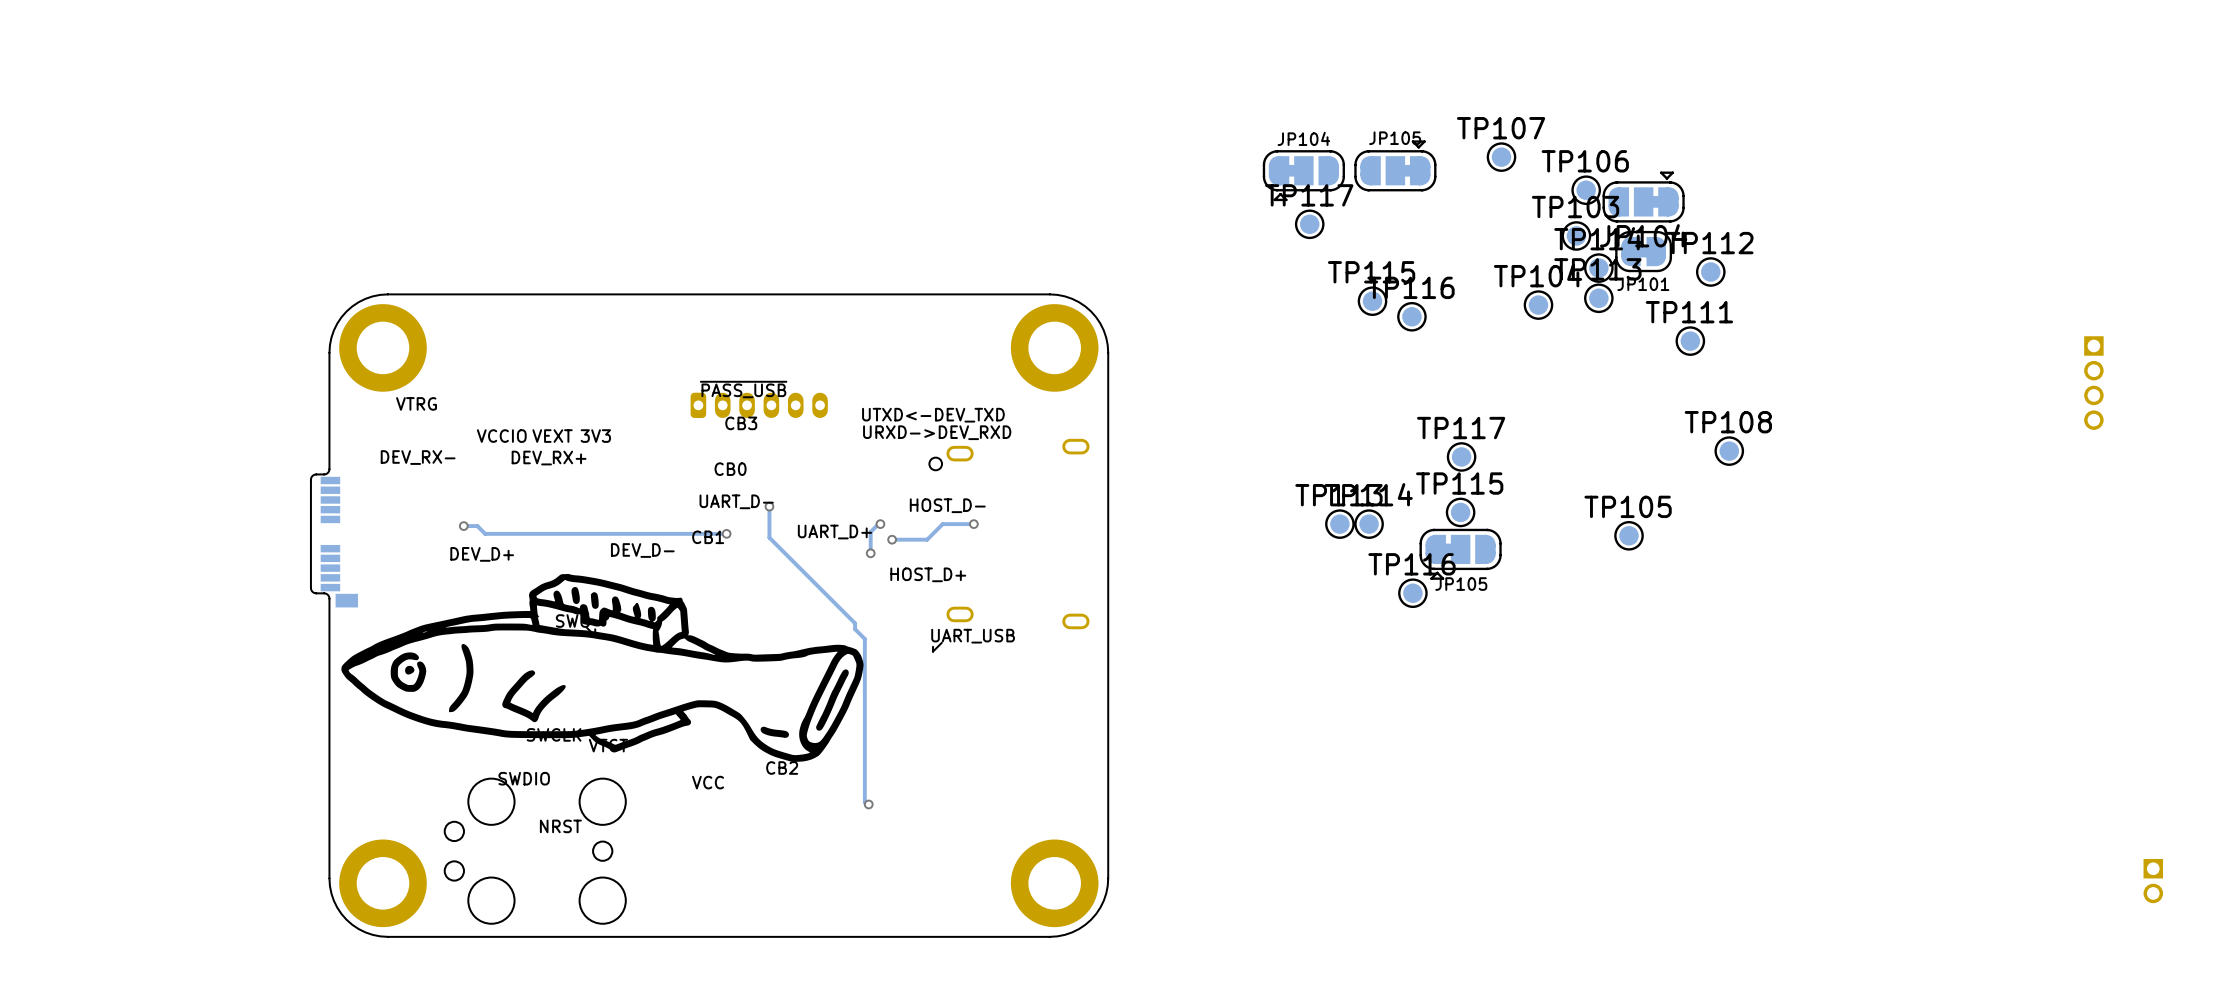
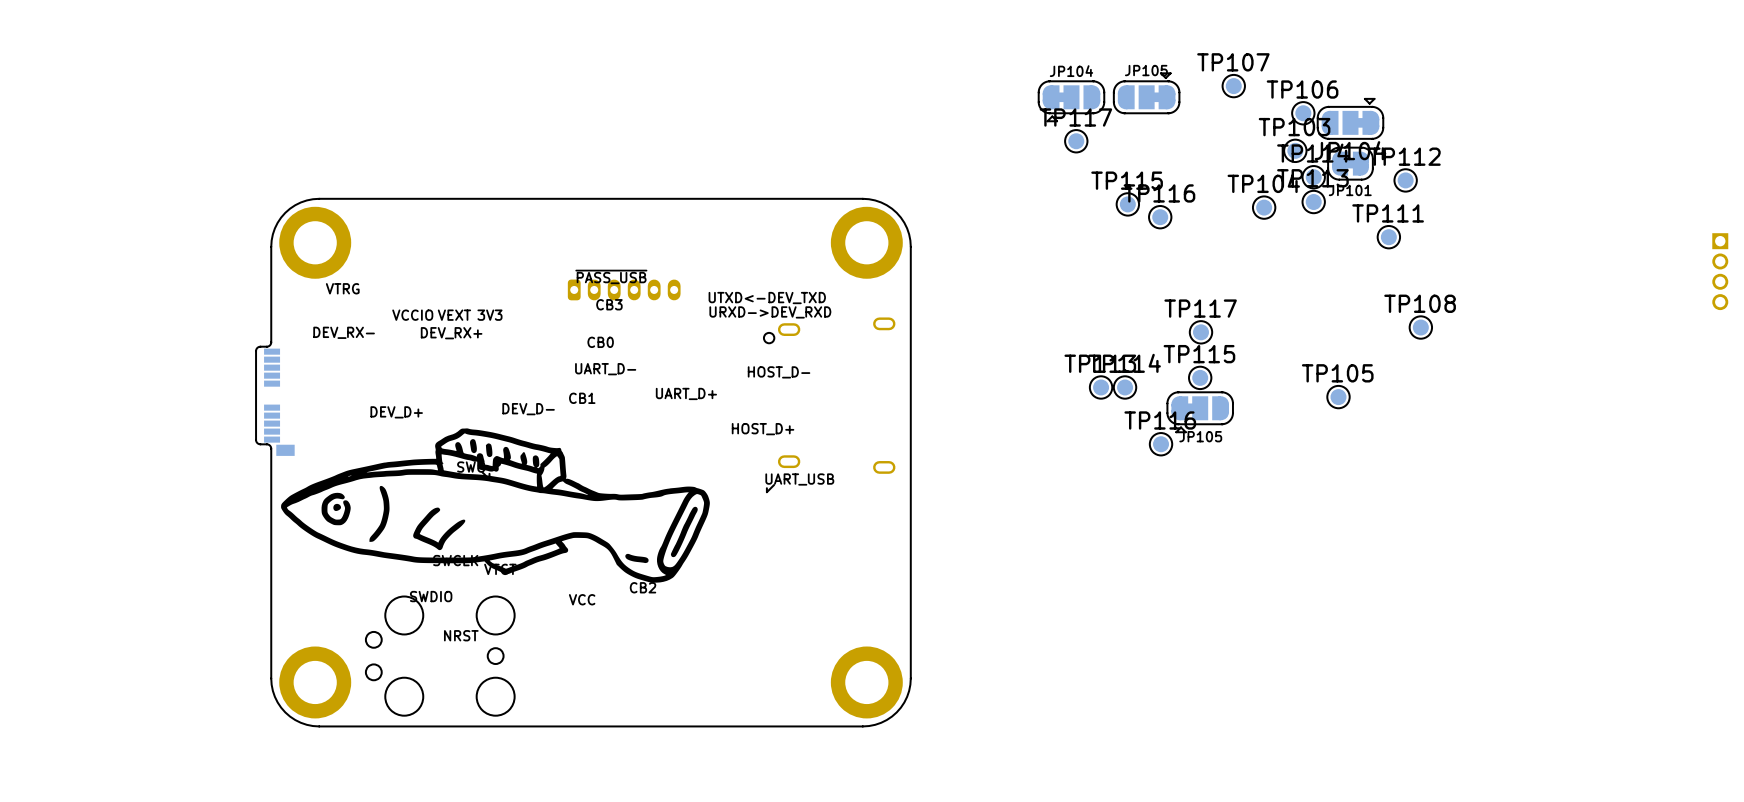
track: (769, 506) (769, 537) (855, 623) (855, 629) (864, 638) (864, 802) (868, 804) -> none
via: (769, 506) -> none
track: (880, 524) (870, 531) (870, 553) -> none
via: (880, 524) -> none
track: (973, 524) (942, 524) (927, 539) (892, 539) -> none
via: (973, 524) -> none
track: (463, 526) (477, 526) (485, 533) (726, 533) -> none
via: (463, 526) -> none
via: (726, 533) -> none
via: (892, 539) -> none
via: (870, 553) -> none
via: (868, 804) -> none

